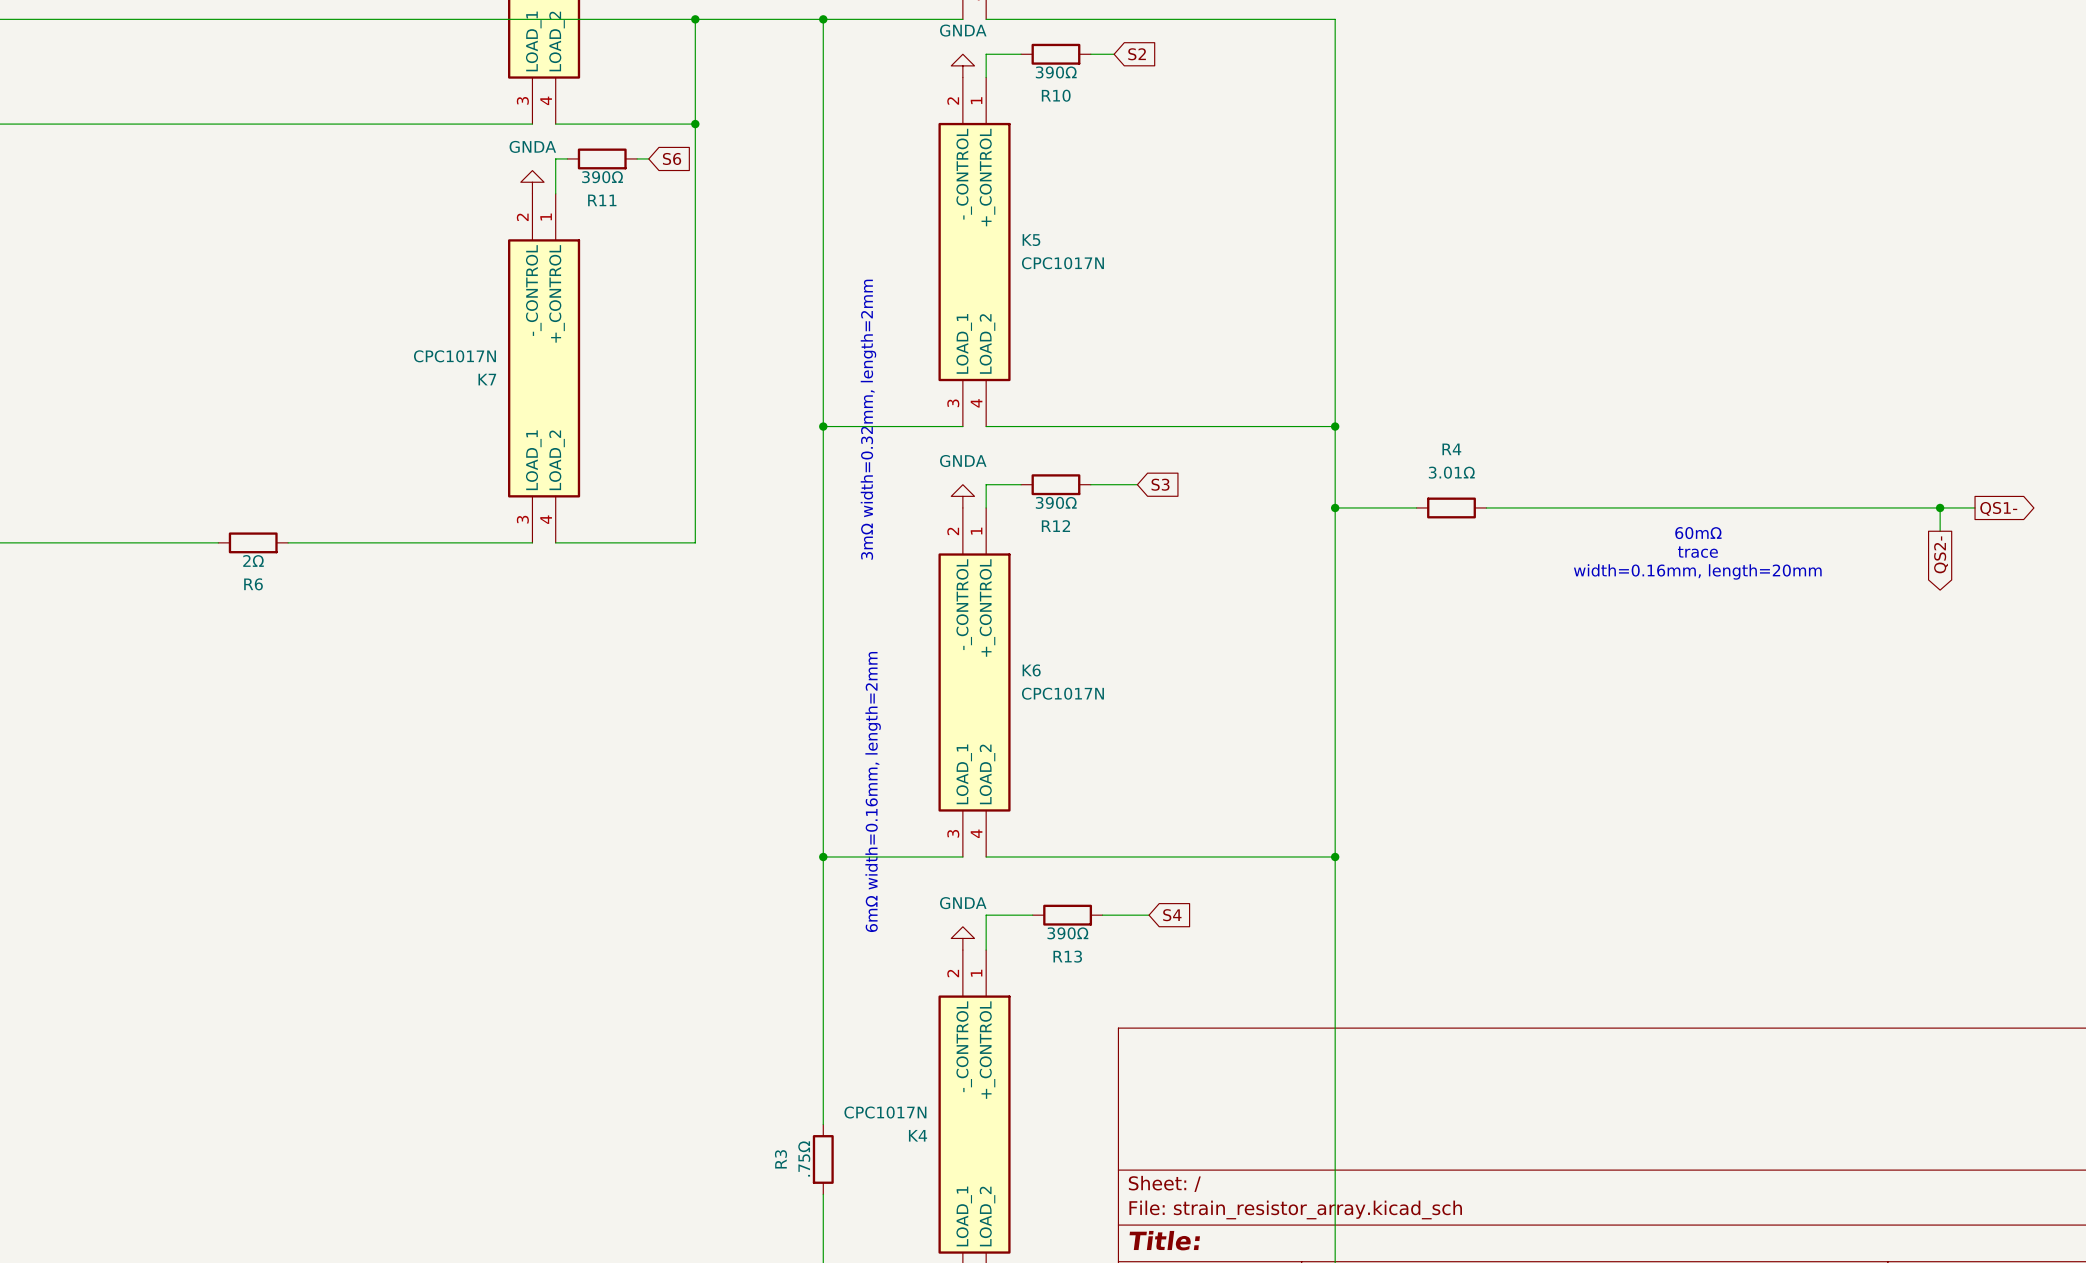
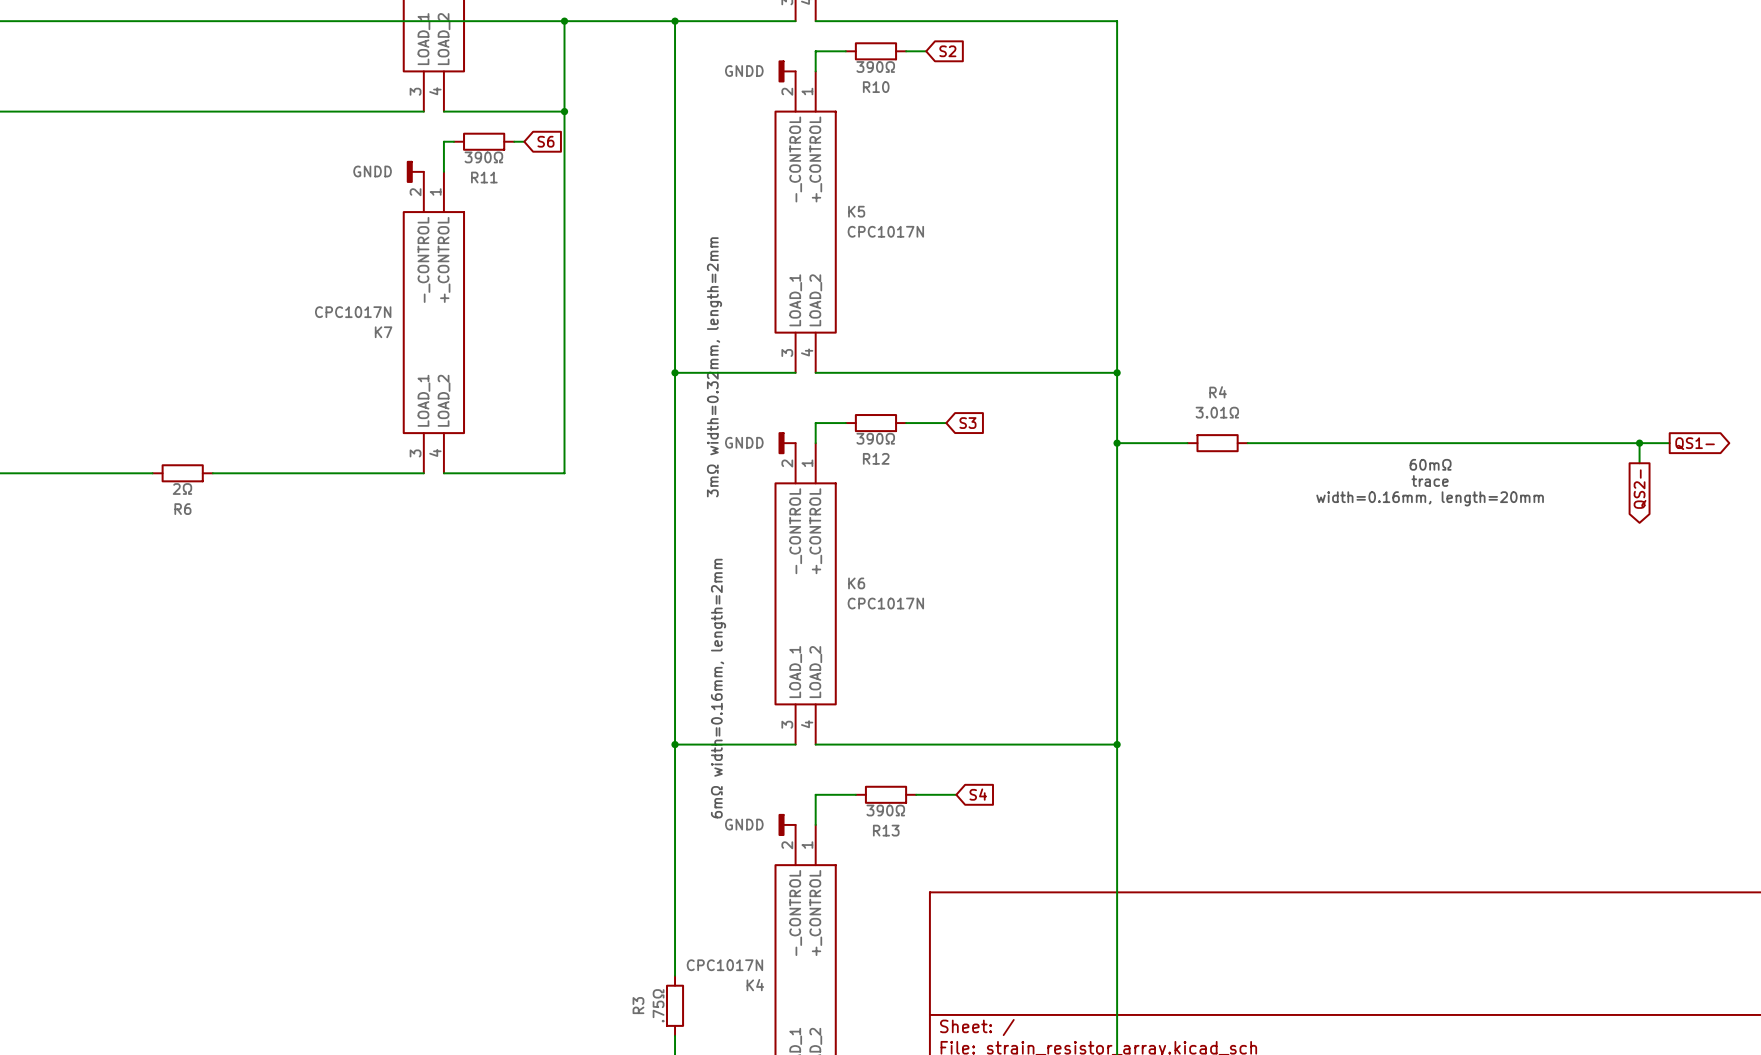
power symbol: GNDA (962, 65) -> none
power symbol: none -> GNDD (787, 71)
power symbol: GNDA (532, 182) -> none
power symbol: none -> GNDD (415, 171)
power symbol: GNDA (962, 496) -> none
power symbol: none -> GNDD (787, 443)
power symbol: GNDA (962, 938) -> none
power symbol: none -> GNDD (787, 824)

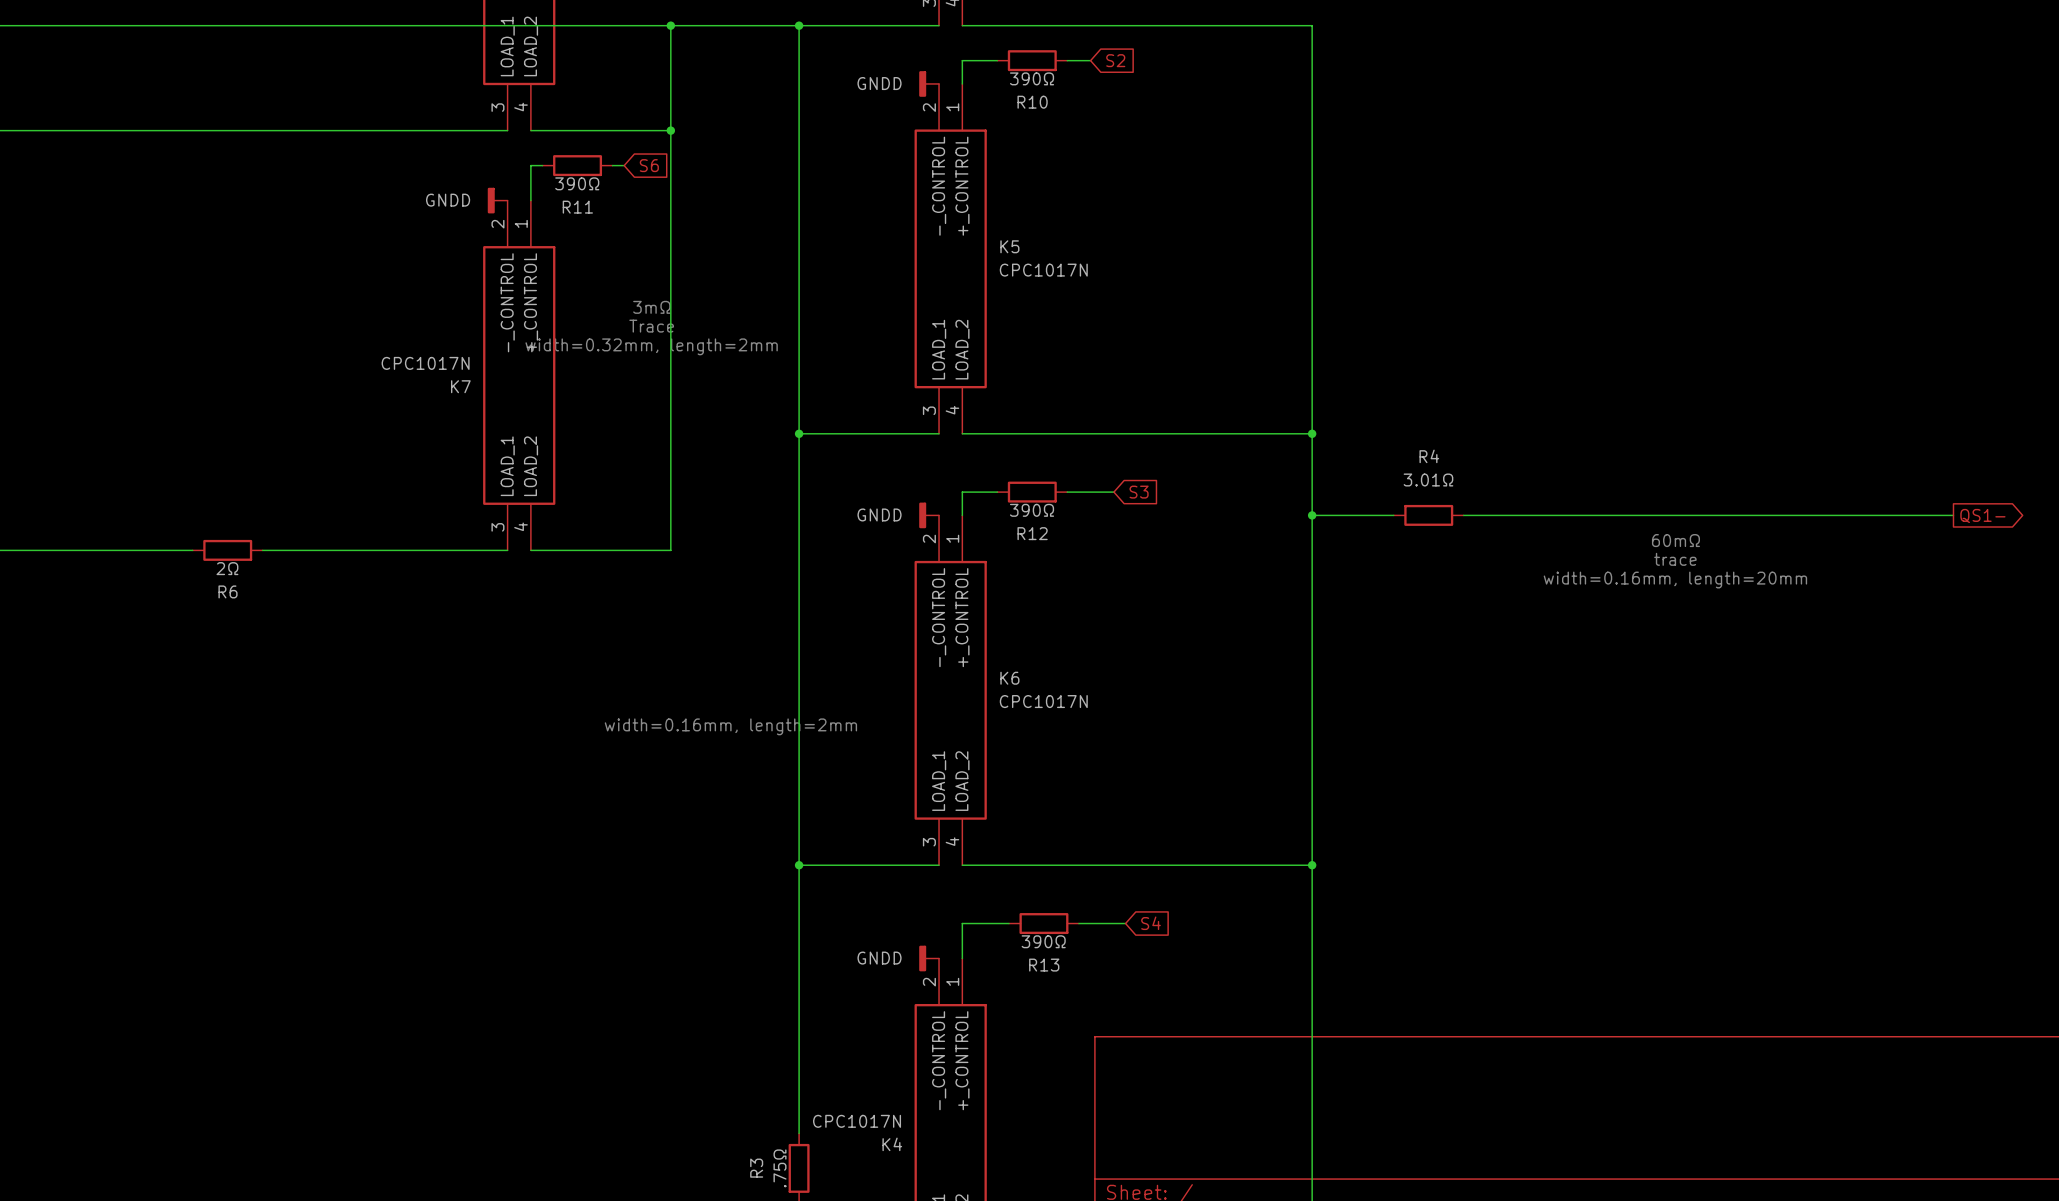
text: none -> 3mΩ (651, 307)
text: none -> Trace (651, 326)
text: none -> width=0.32mm, length=2mm (651, 346)
text: 3mΩ width=0.32mm, length=2mm (714, 367) -> none
wire: (1639, 443) (1639, 463) -> none
junction: (1639, 443) -> none
global label: QS2- (1640, 489) -> none
text: 6mΩ width=0.16mm, length=2mm (718, 688) -> width=0.16mm, length=2mm (730, 726)

